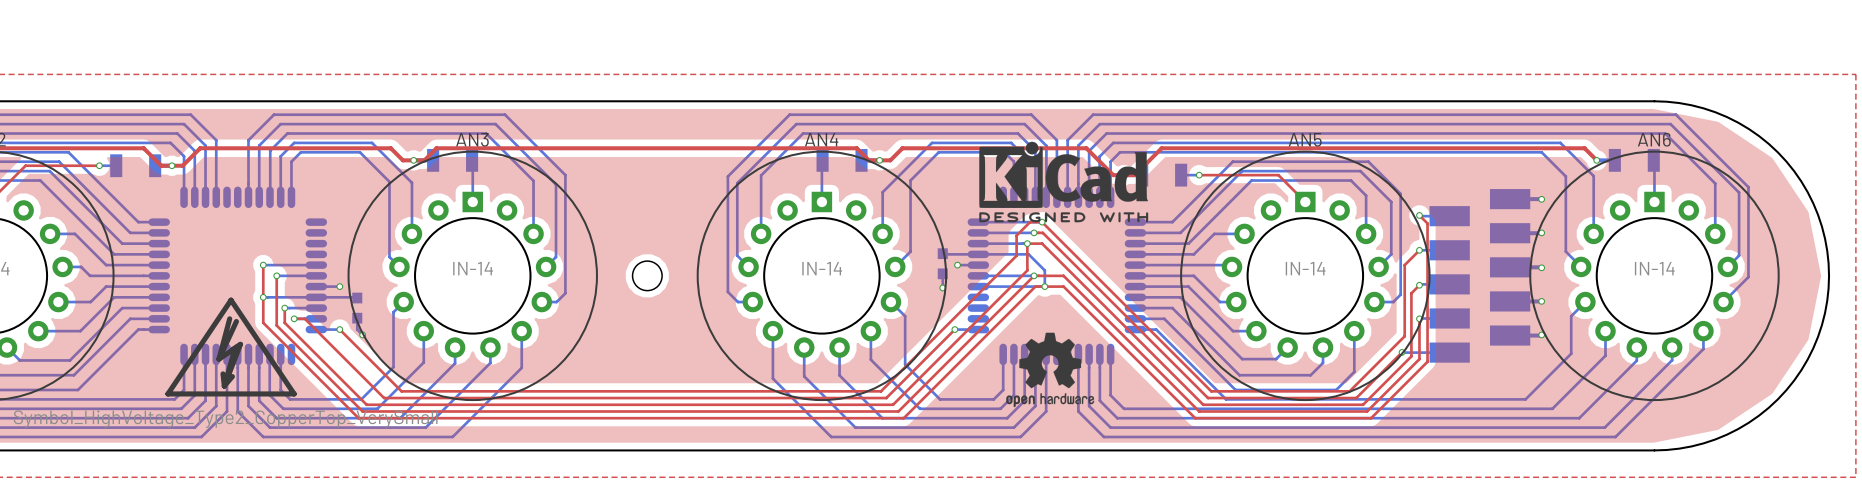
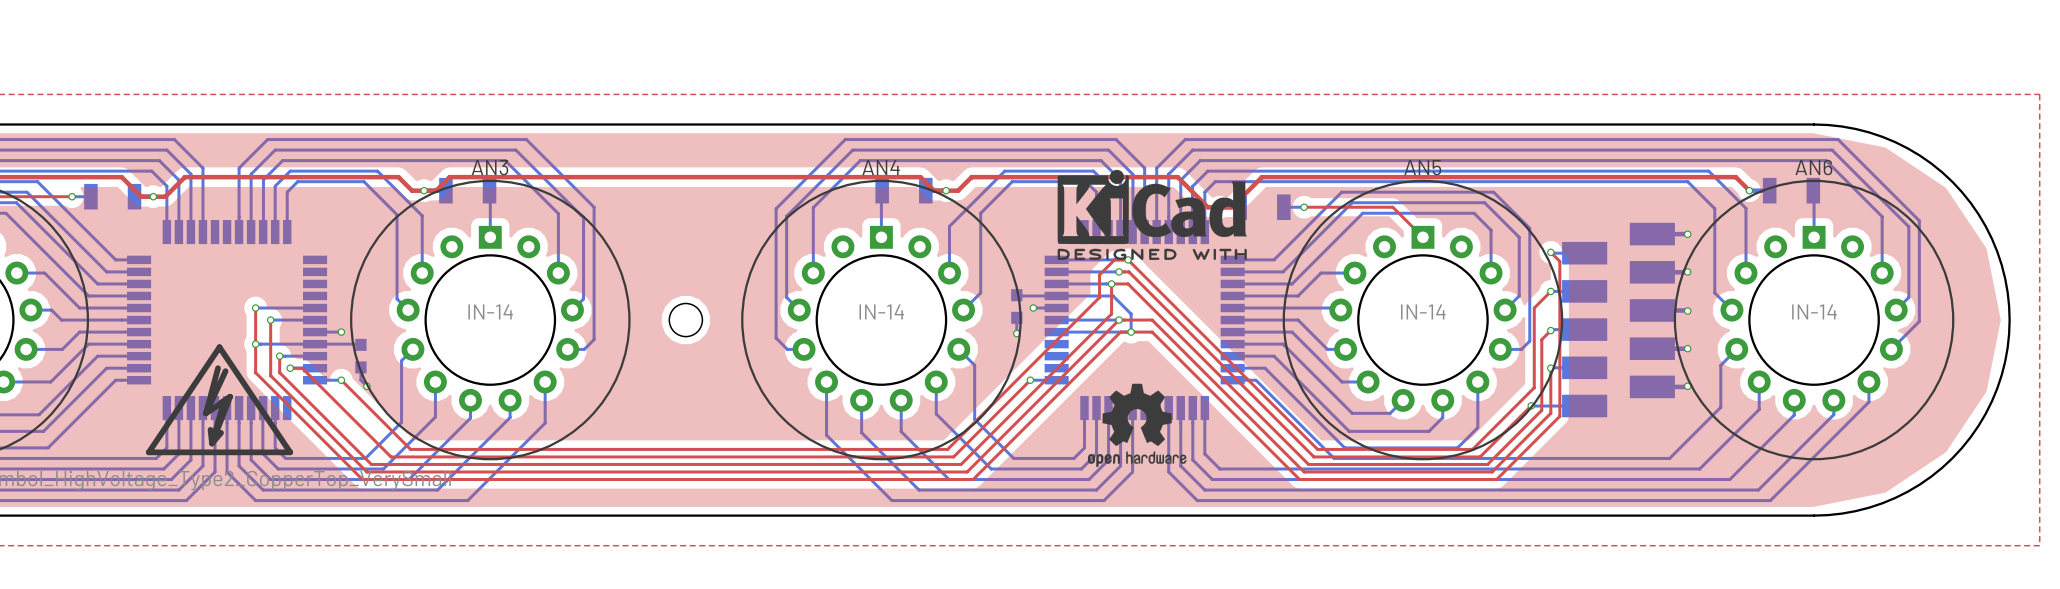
part footprint: [148, 186, 328, 366] -> [127, 220, 328, 421]
part footprint: [967, 186, 1147, 366] -> [1044, 220, 1245, 421]

